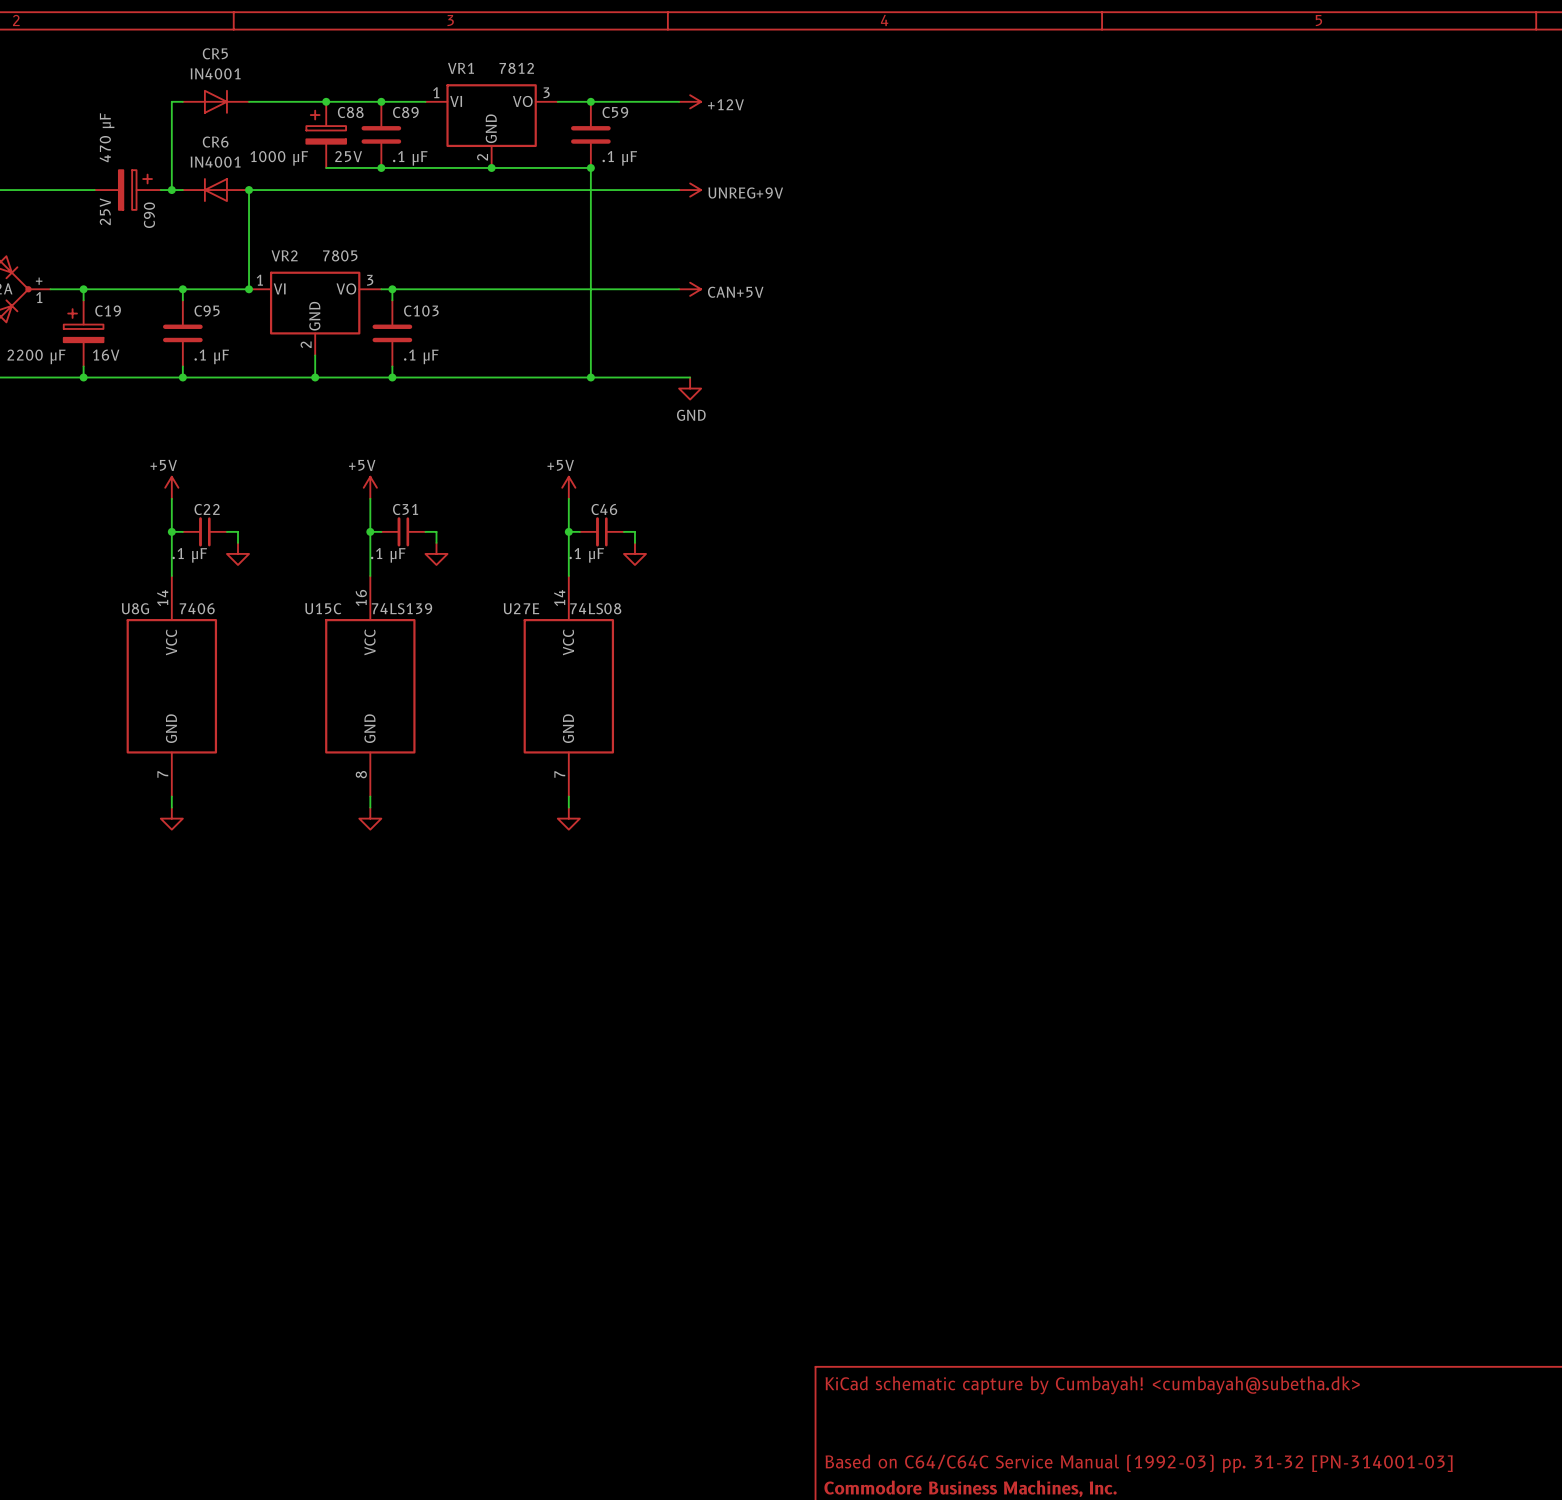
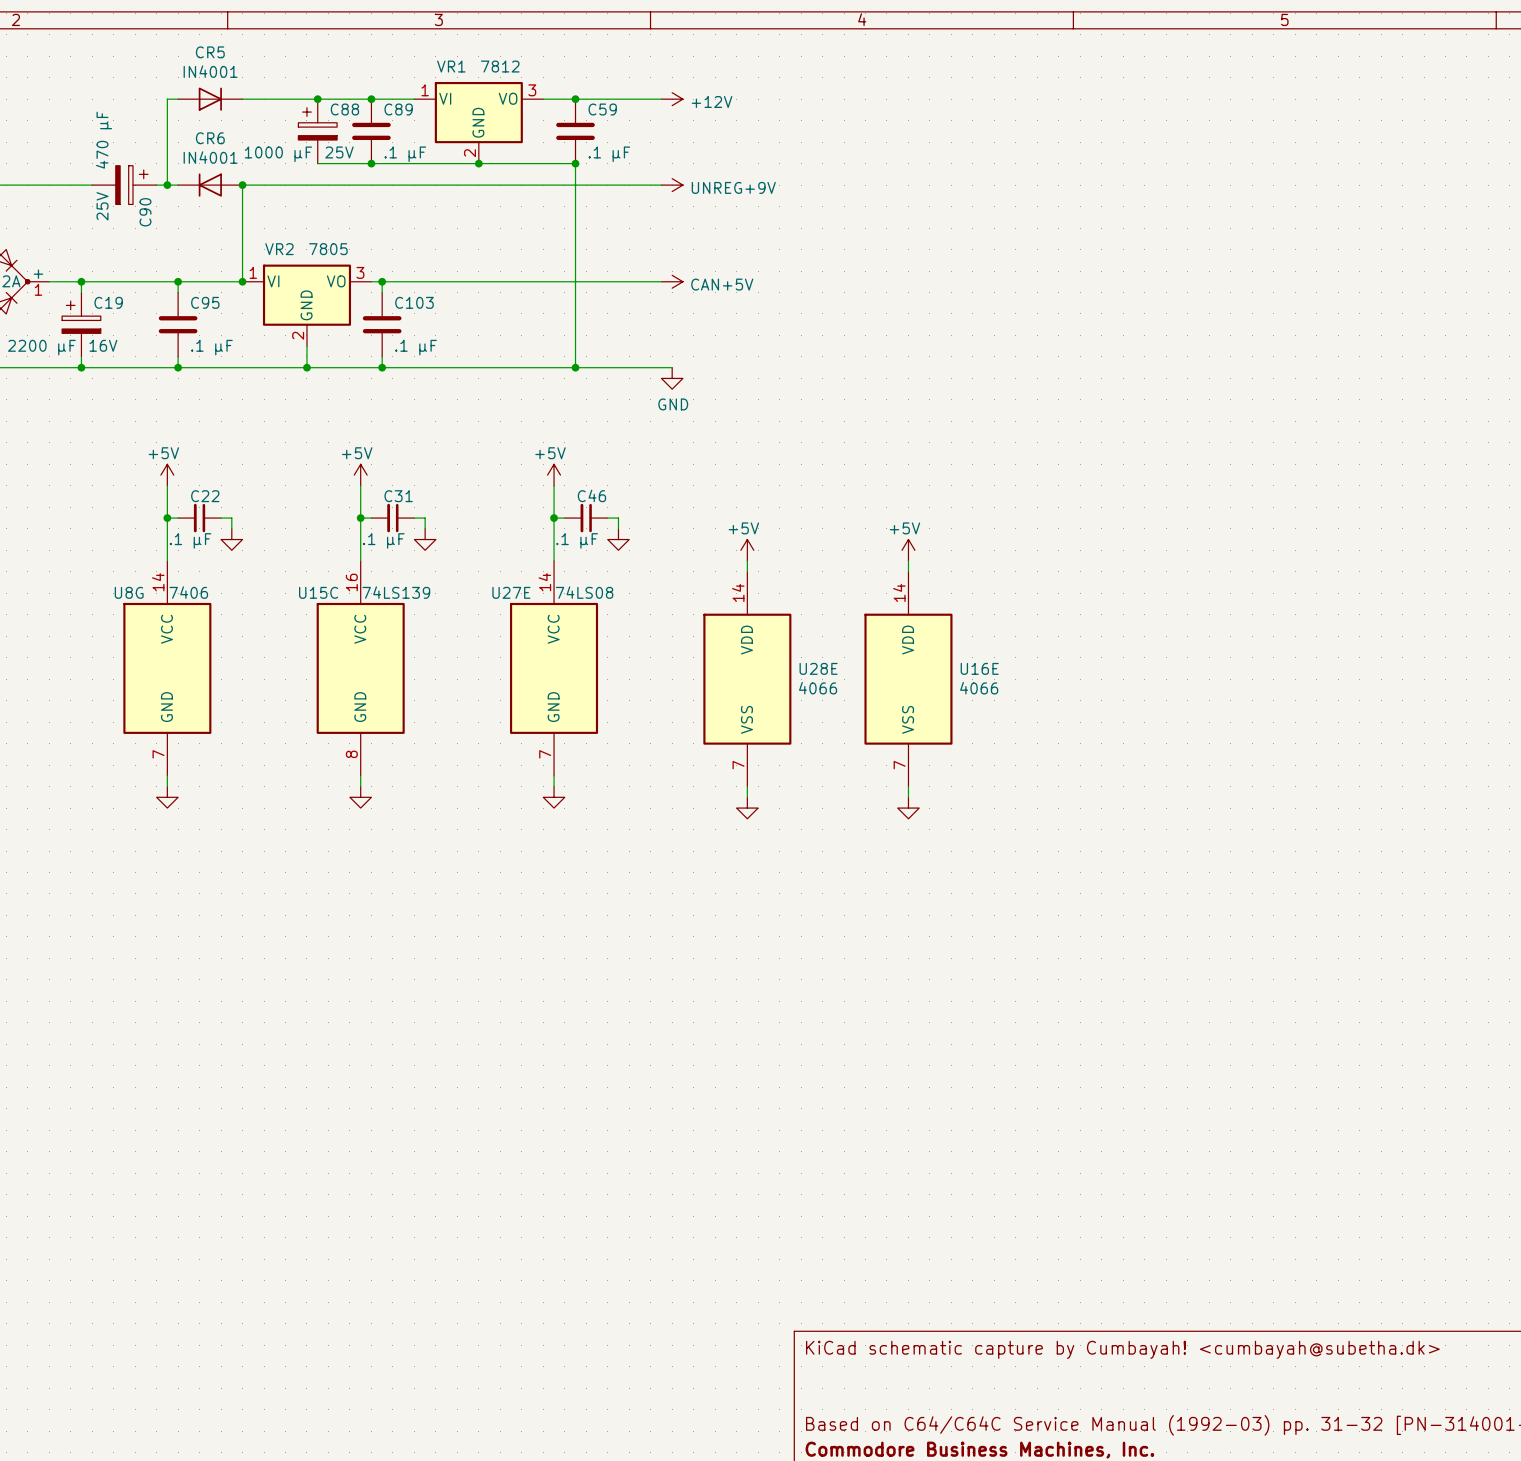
power symbol: none -> +5V (747, 550)
power symbol: none -> +5V (908, 550)
wire: none -> (747, 561) (747, 571)
wire: none -> (908, 561) (908, 571)
U28E: none -> 4066 (747, 679)
U16E: none -> 4066 (908, 679)
wire: none -> (747, 786) (747, 797)
wire: none -> (908, 786) (908, 797)
power symbol: none -> (747, 808)
power symbol: none -> (908, 808)

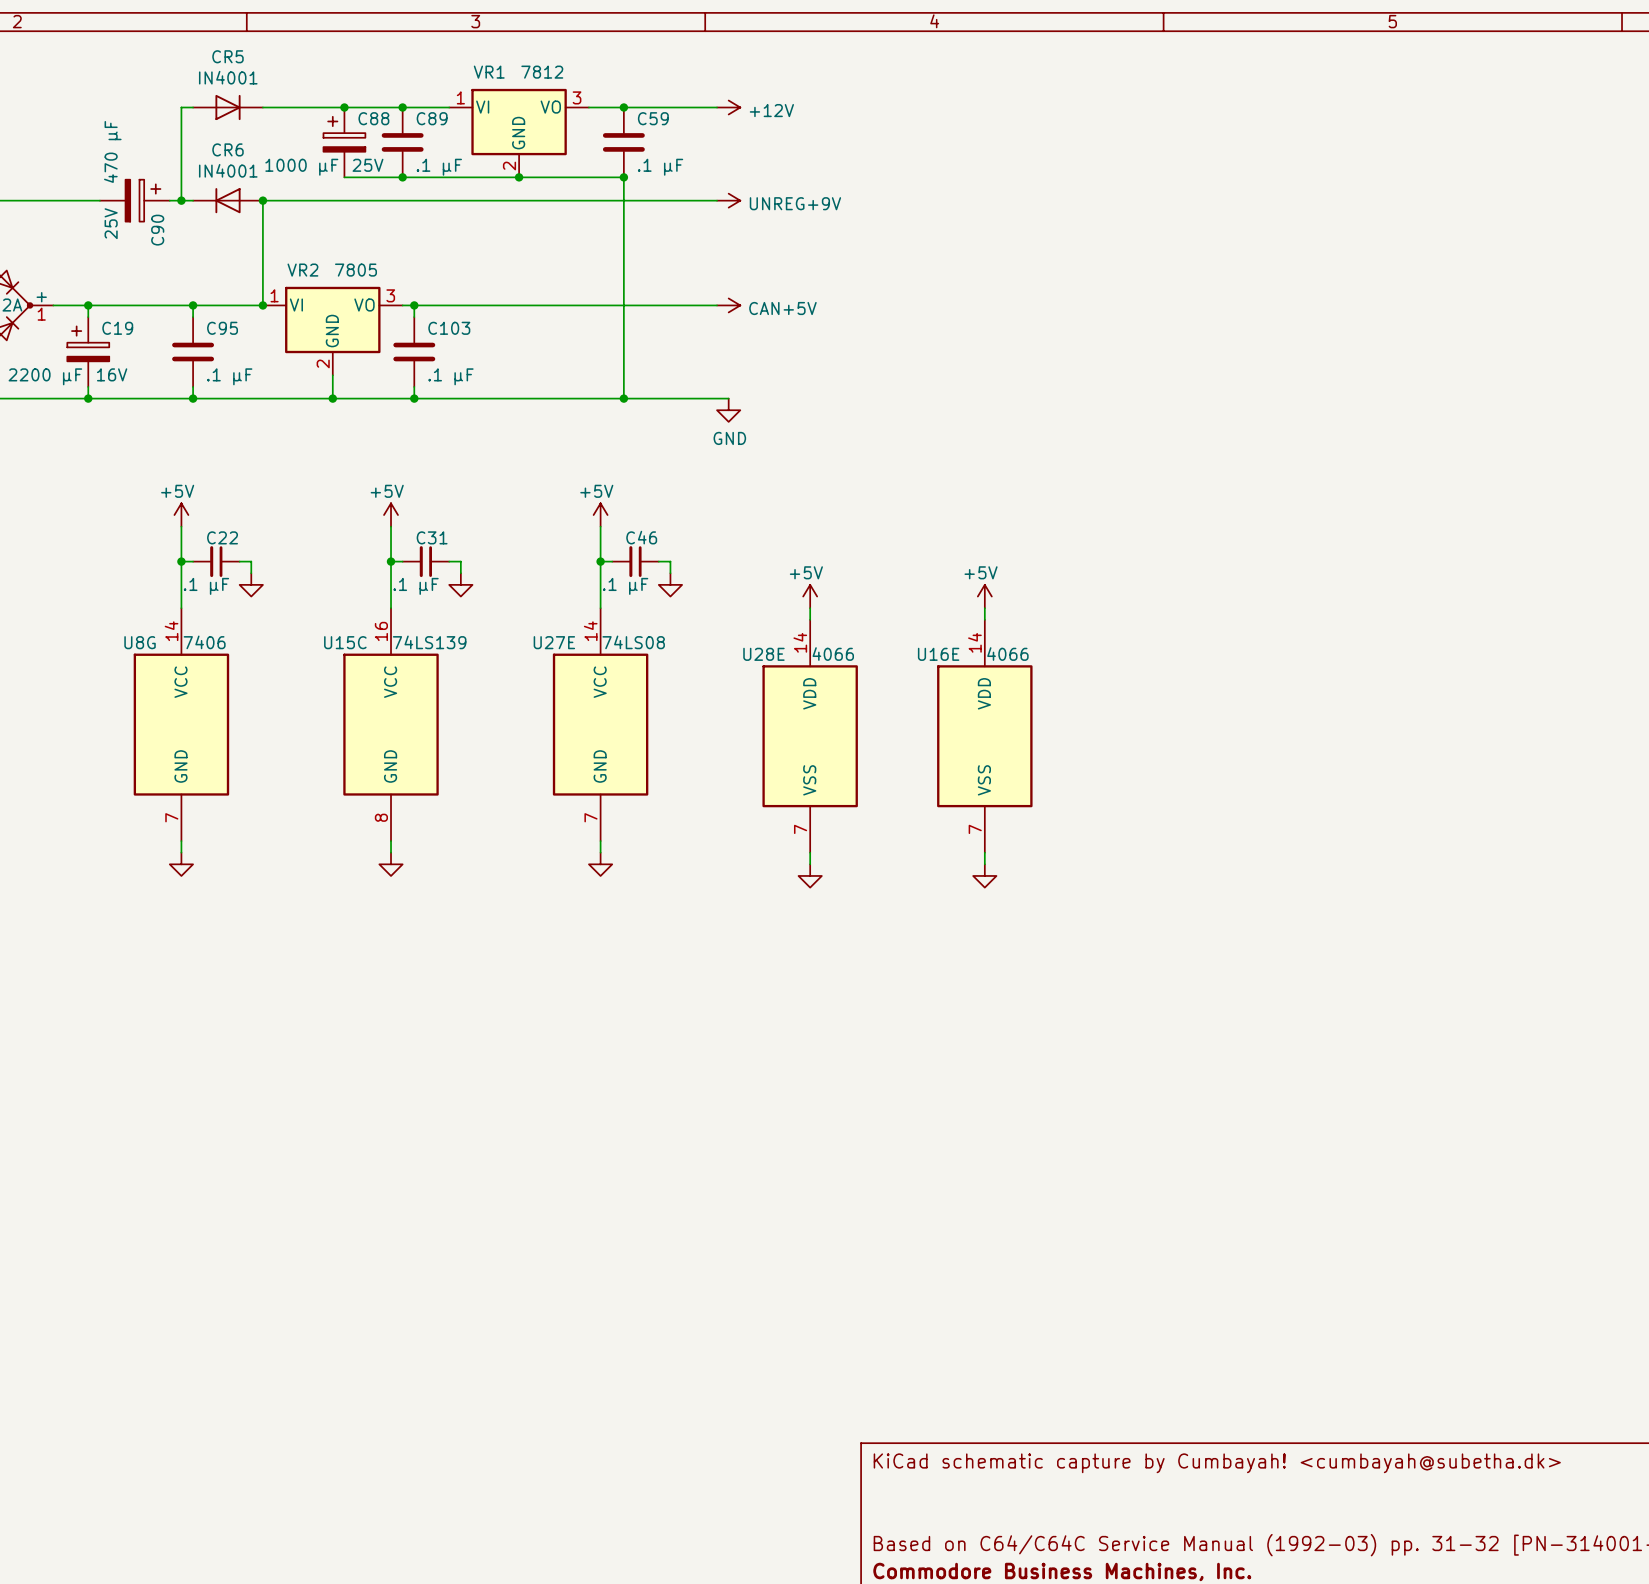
U28E name position: U28E (818, 668) -> U28E (763, 654)
U16E name position: U16E (979, 668) -> U16E (938, 654)
U28E value position: 4066 (818, 688) -> 4066 (833, 654)
U16E value position: 4066 (979, 688) -> 4066 (1007, 654)

